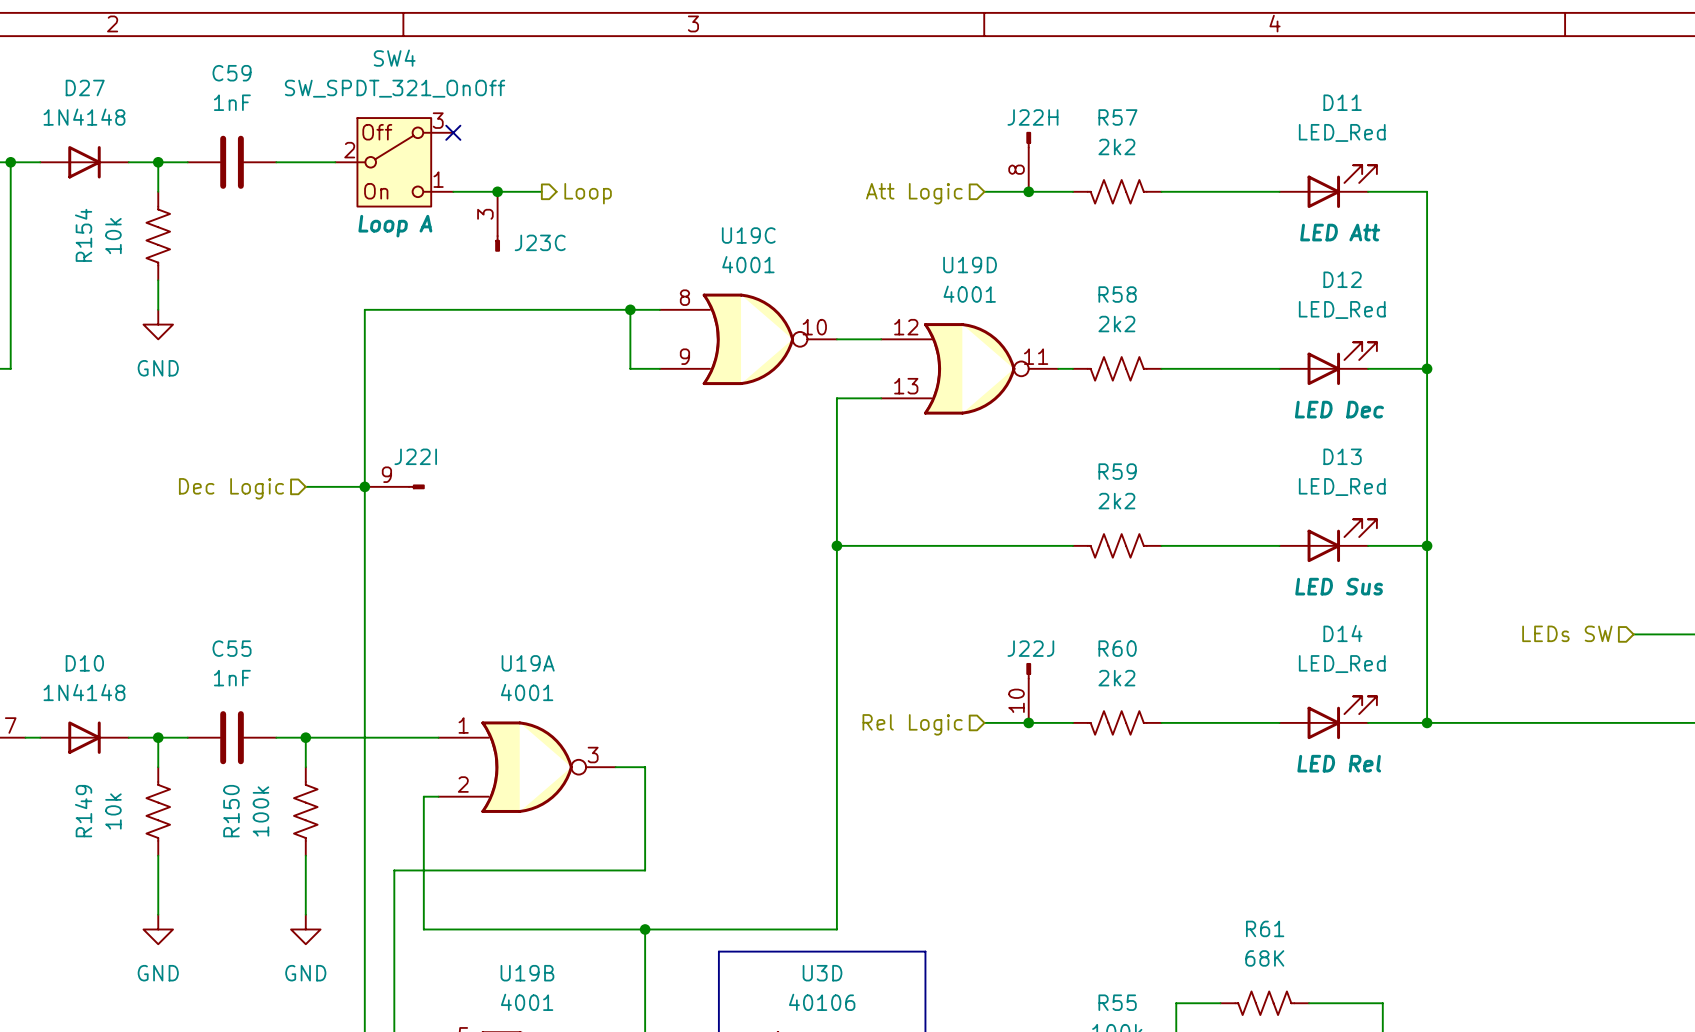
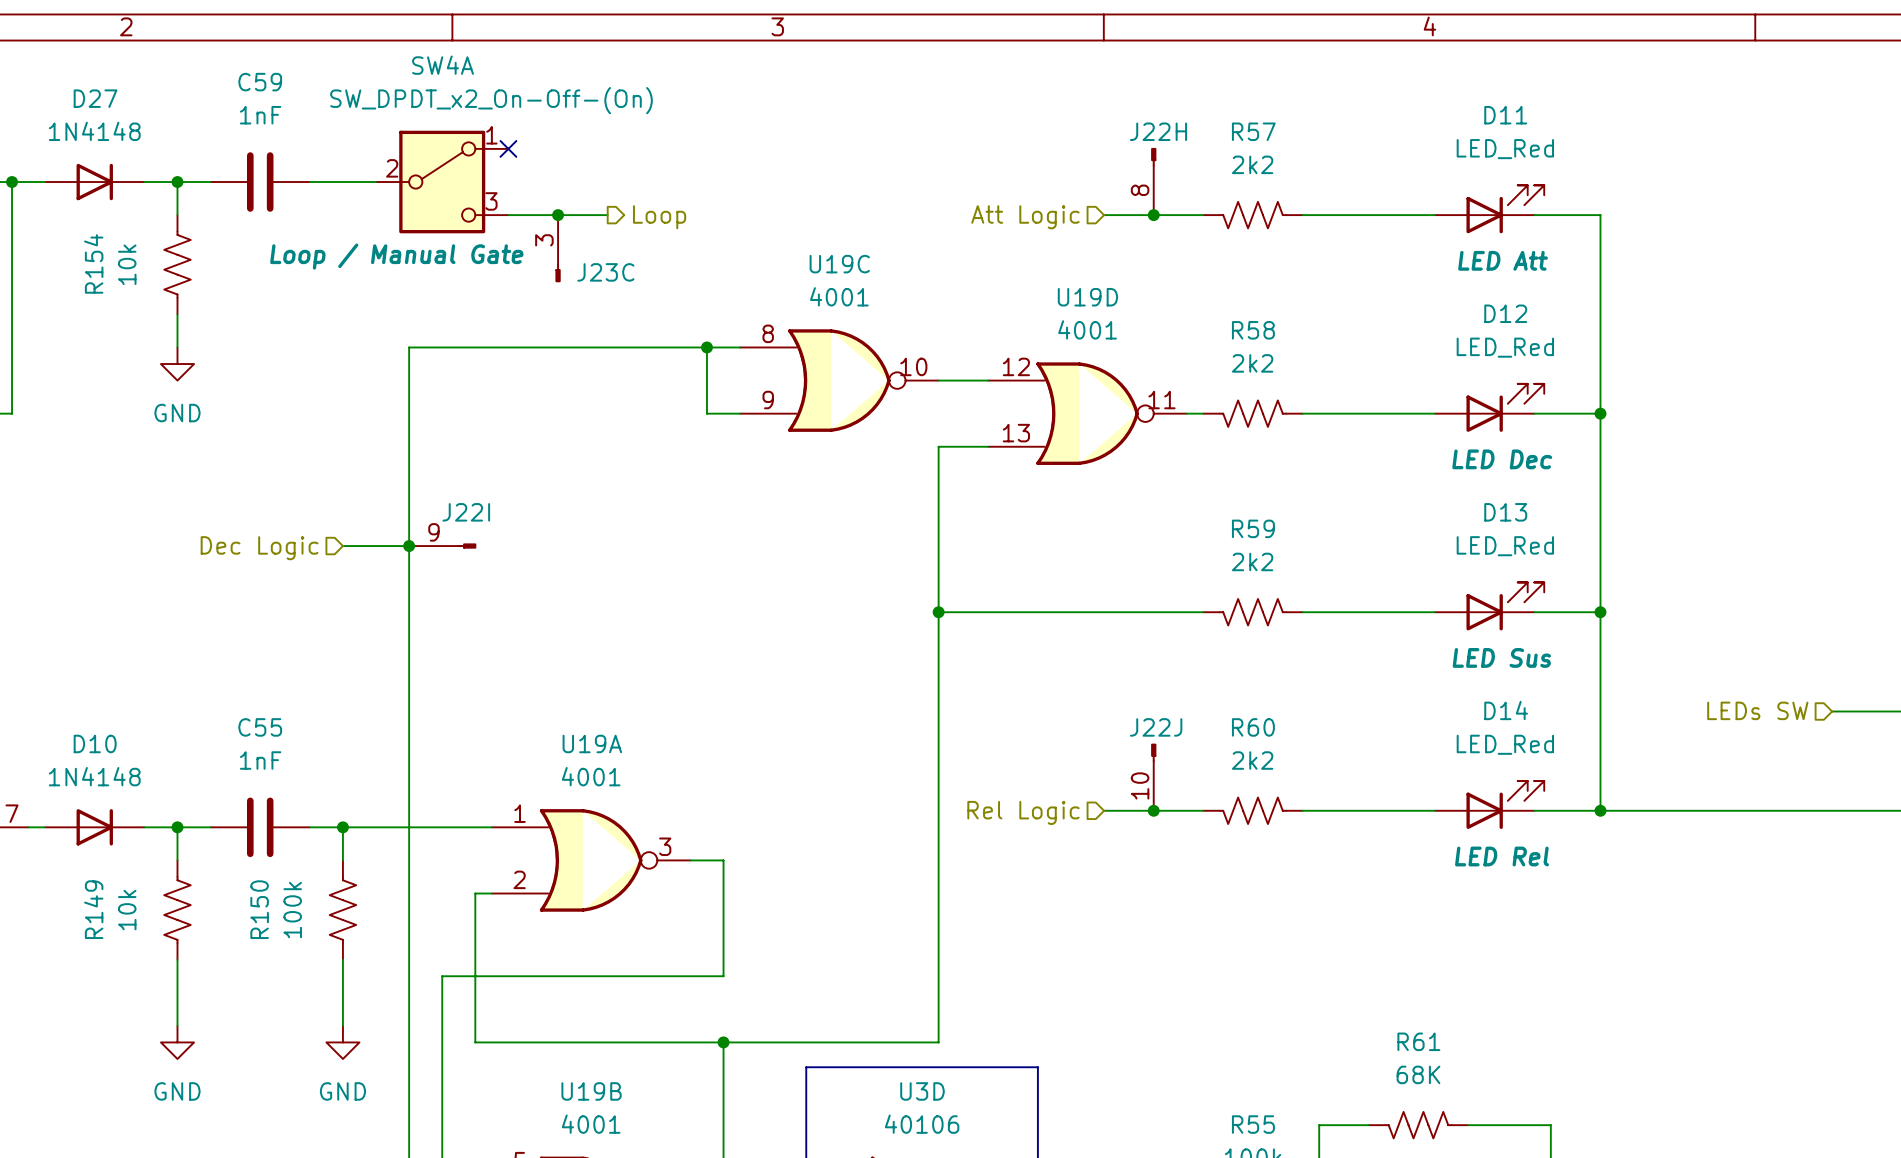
SW4: SW_SPDT_321_OnOff (394, 162) -> none
SW4A: none -> SW_DPDT_x2_On-Off-(On) (442, 182)

